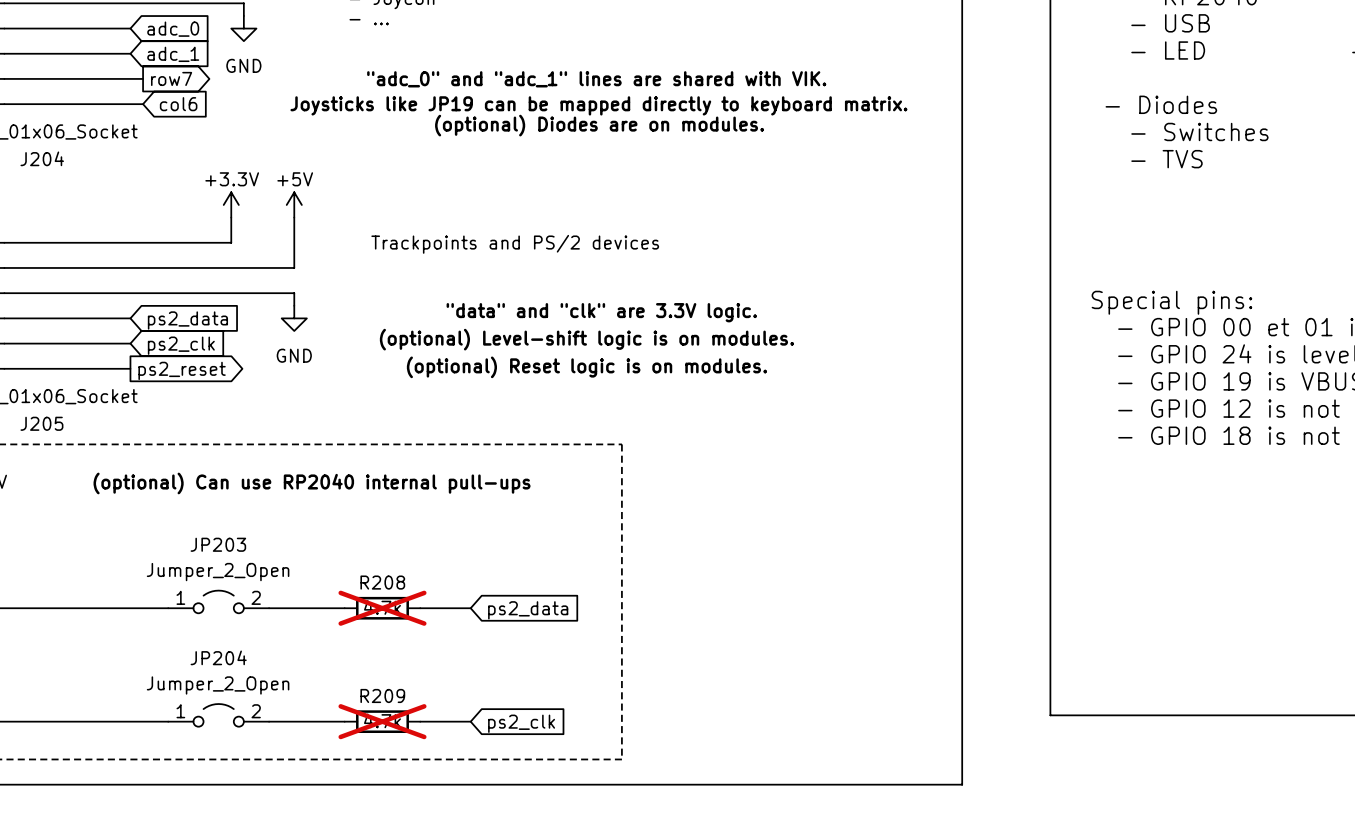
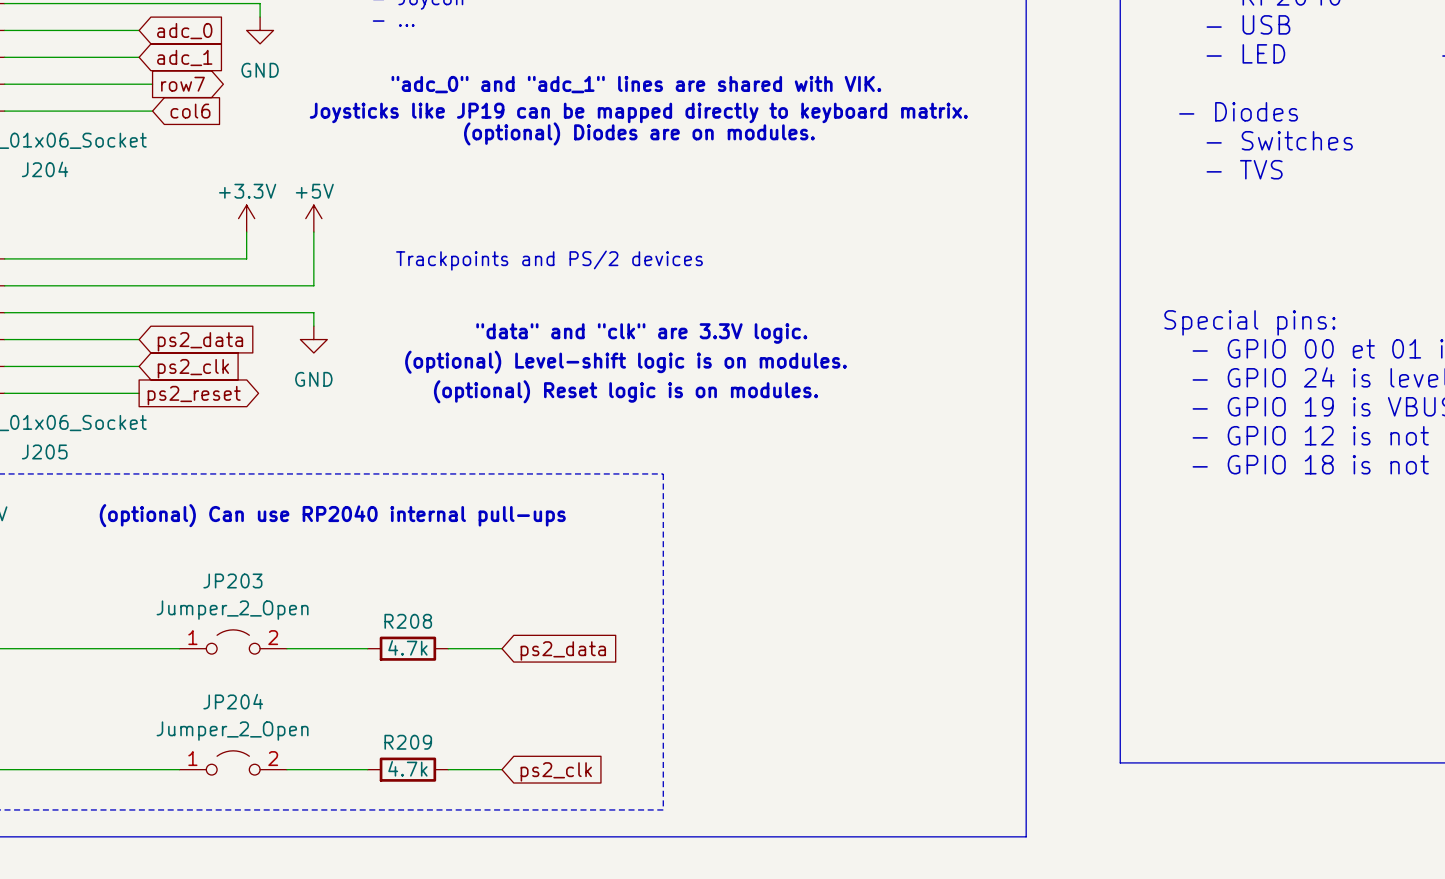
R208 do-not-place cross: (382, 608) -> none
R209 do-not-place cross: (382, 721) -> none

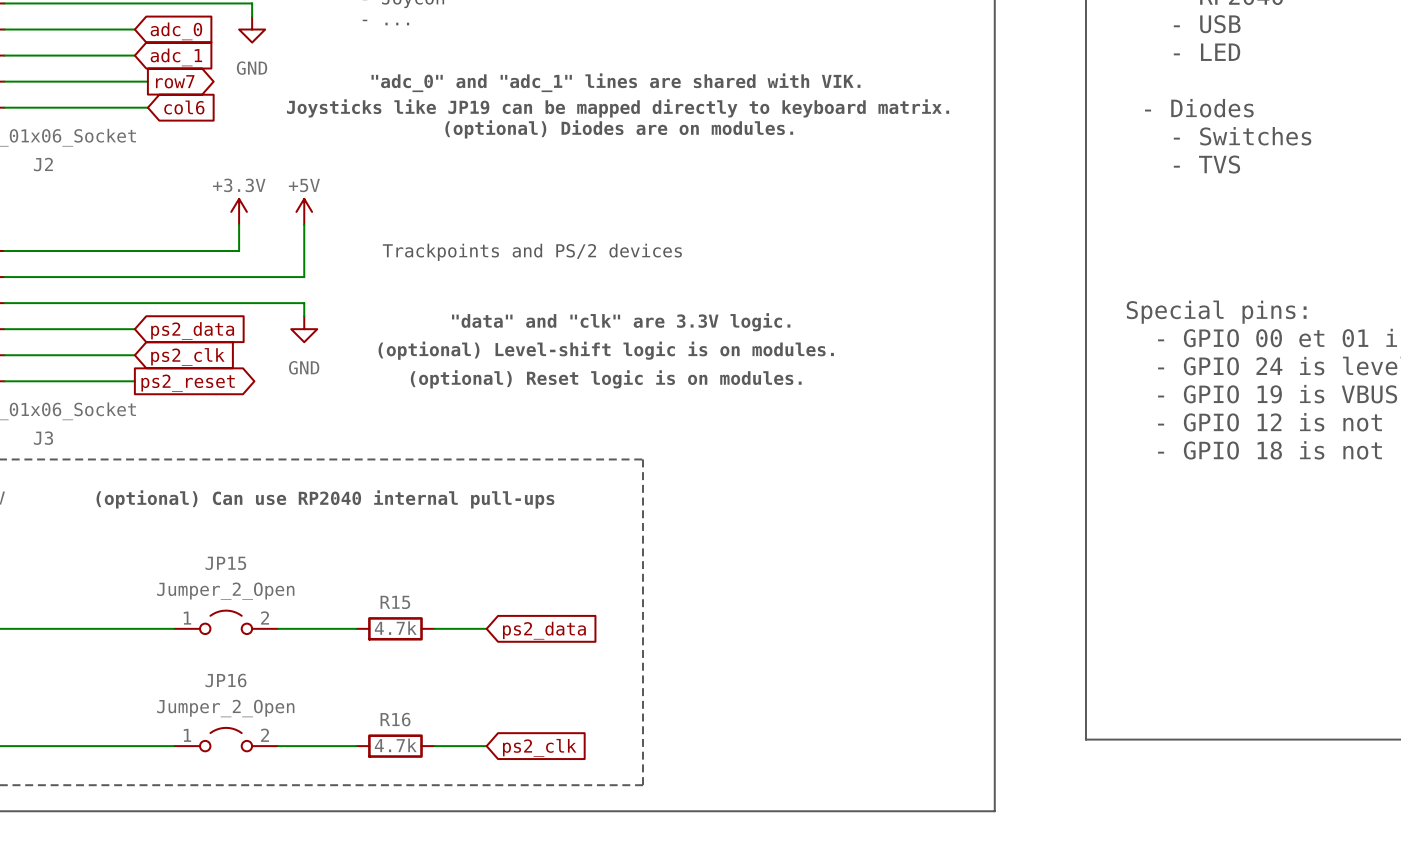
J204 name: J204 (45, 169) -> J2 (43, 164)
J205 name: J205 (44, 451) -> J3 (43, 438)
JP203 name: JP203 (232, 580) -> JP15 (225, 563)
R208 name: R208 (408, 621) -> R15 (395, 602)
JP204 name: JP204 (233, 701) -> JP16 (225, 680)
R209 name: R209 (408, 742) -> R16 (395, 719)

